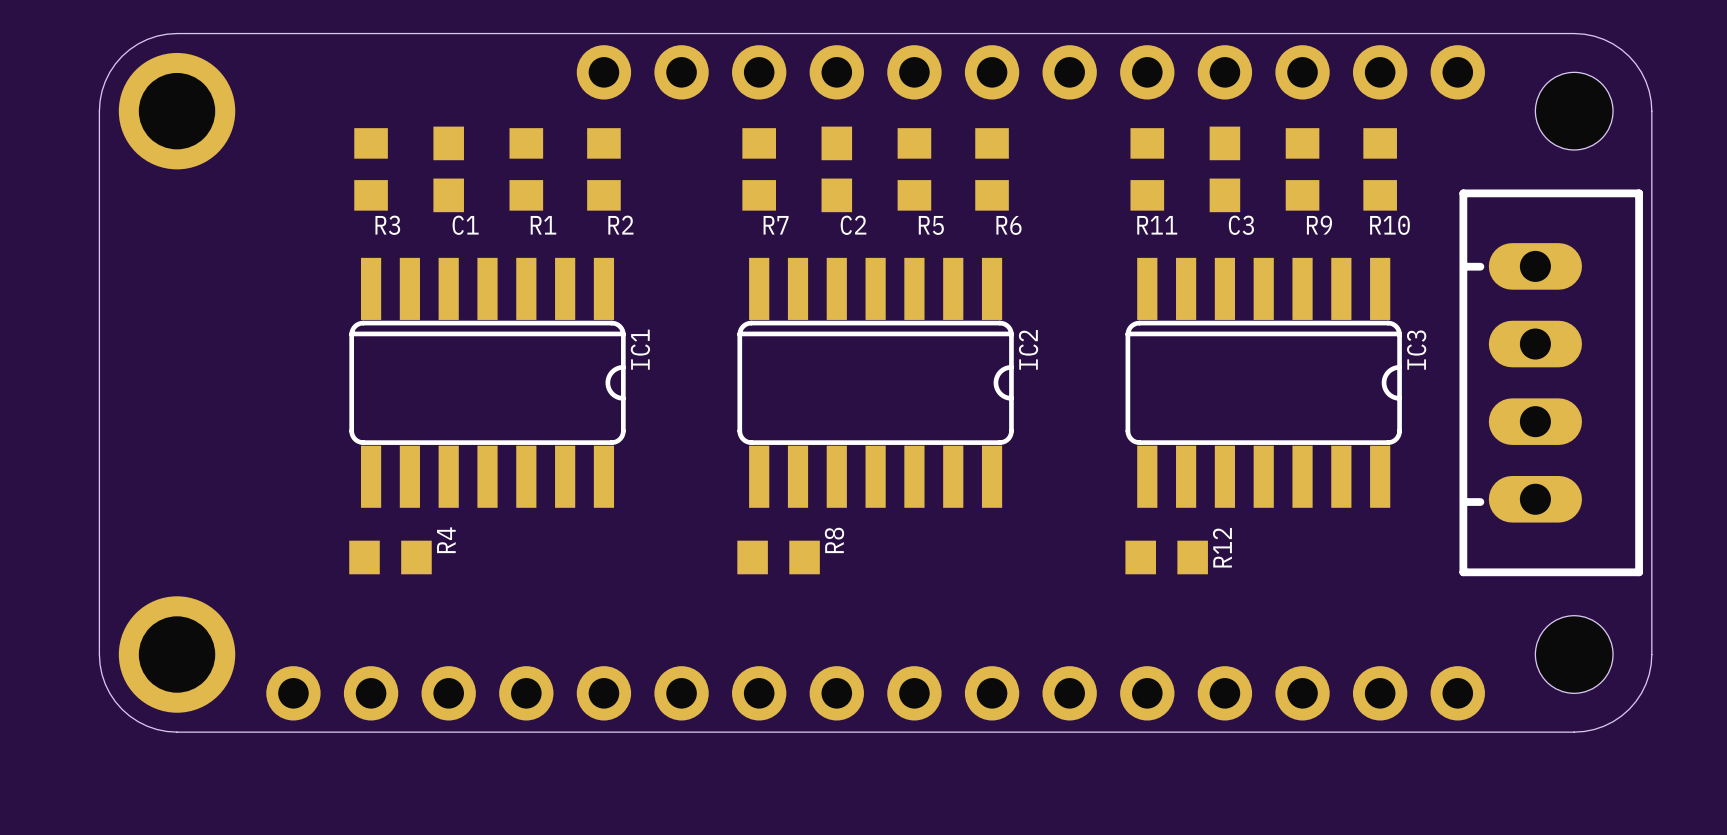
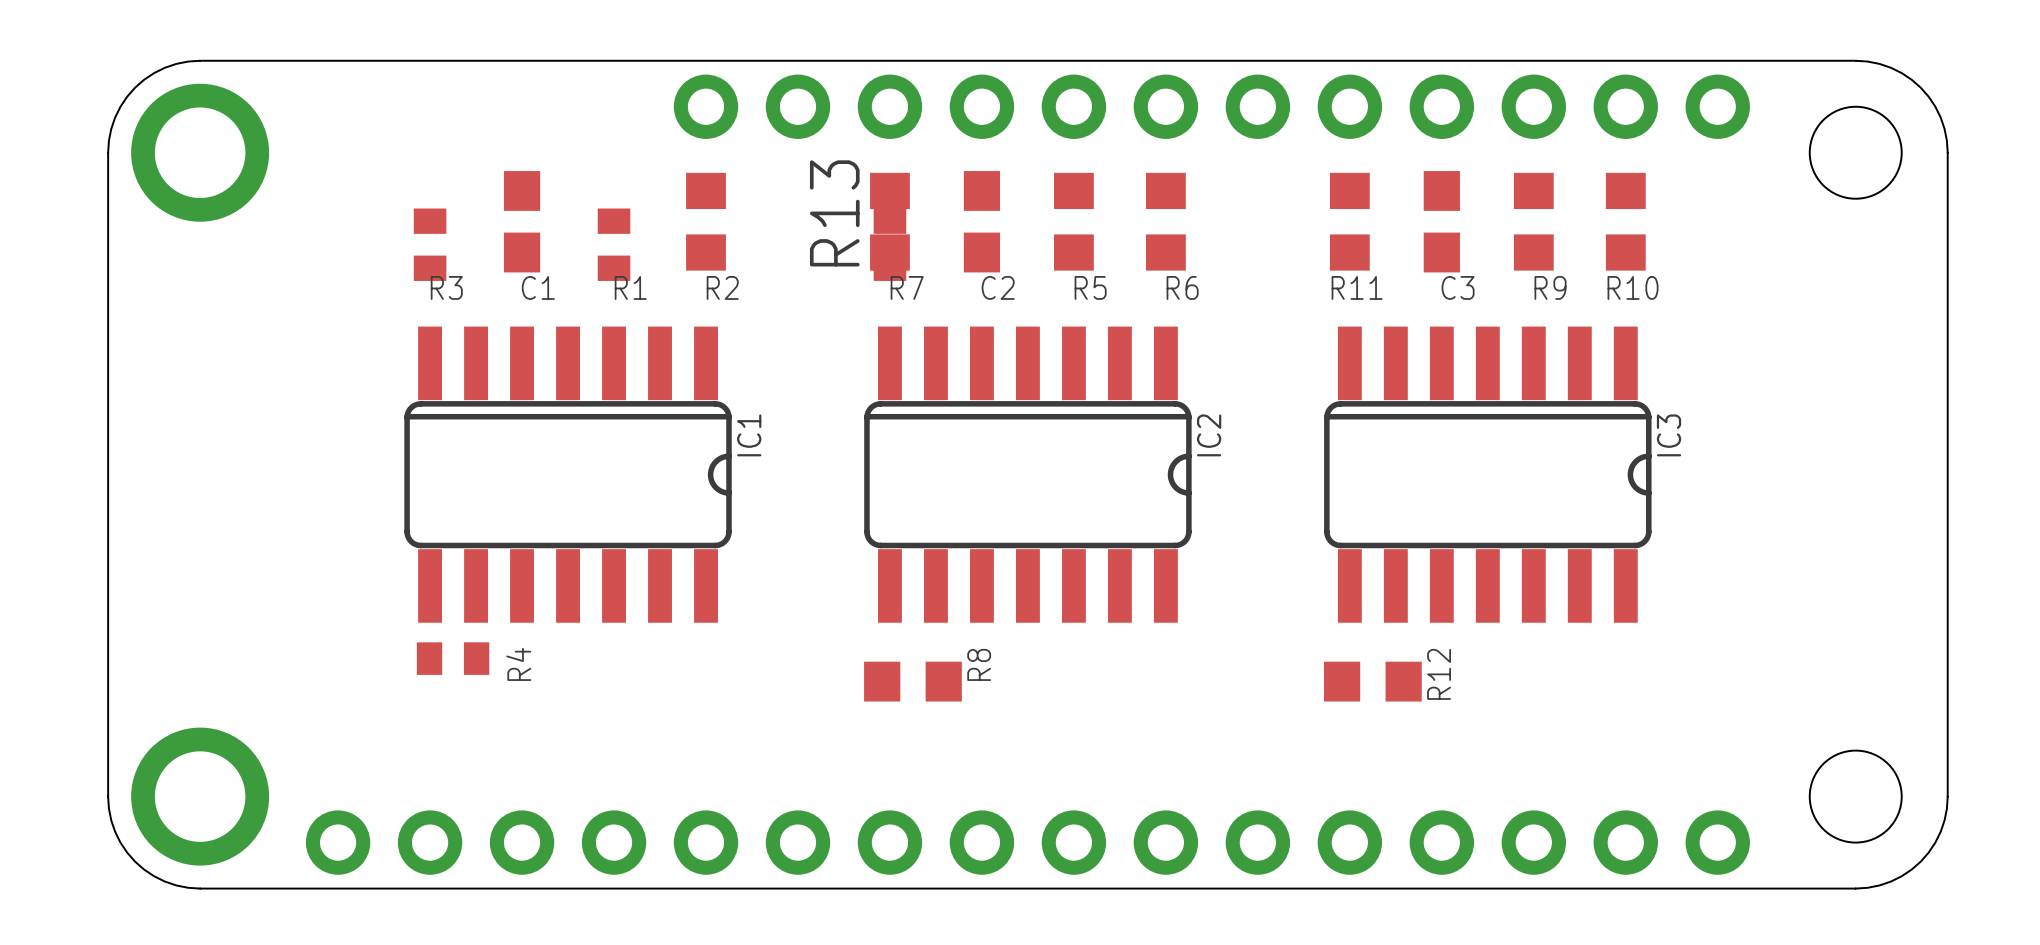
R3 footprint: [354, 128, 388, 211] -> [413, 208, 447, 281]
R1 footprint: [509, 128, 544, 211] -> [597, 208, 631, 281]
R13: none -> (889, 244)
part: (1551, 382) -> none
R4 footprint: [349, 540, 432, 575] -> [416, 642, 490, 675]

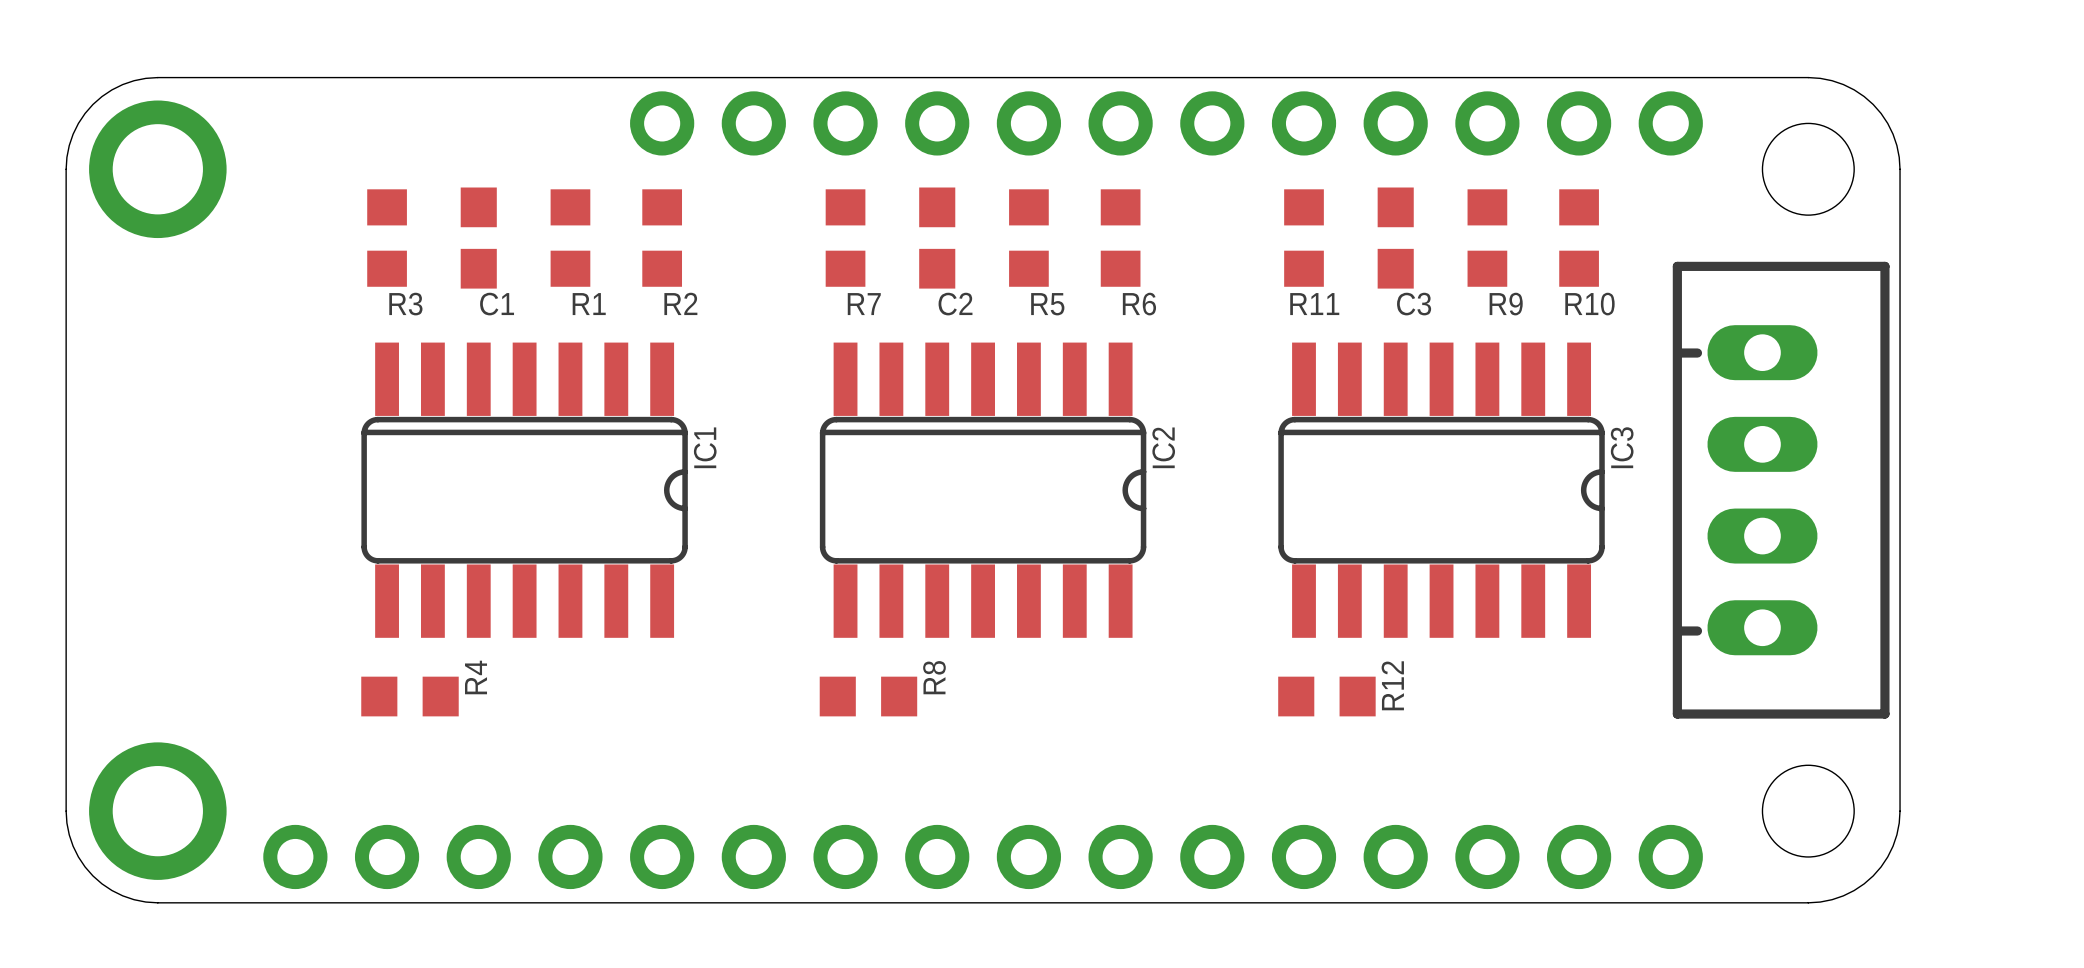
R3 footprint: [413, 208, 447, 281] -> [367, 189, 407, 287]
R1 footprint: [597, 208, 631, 281] -> [550, 189, 591, 287]
R13: (889, 244) -> none
part: none -> (1781, 490)
R4 footprint: [416, 642, 490, 675] -> [361, 676, 459, 717]

